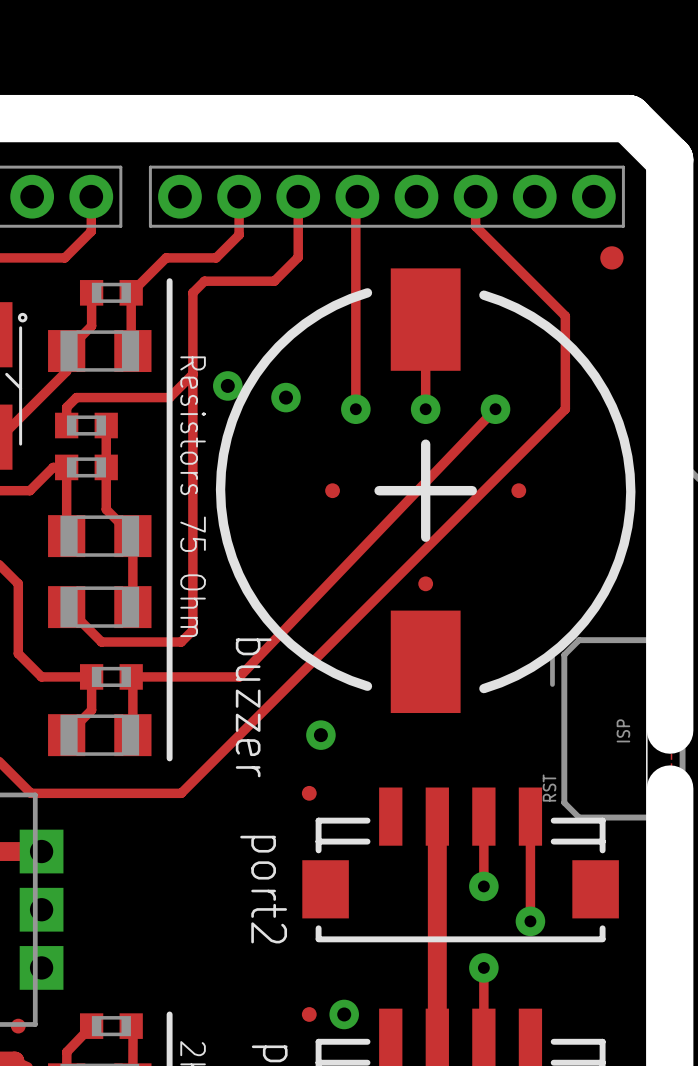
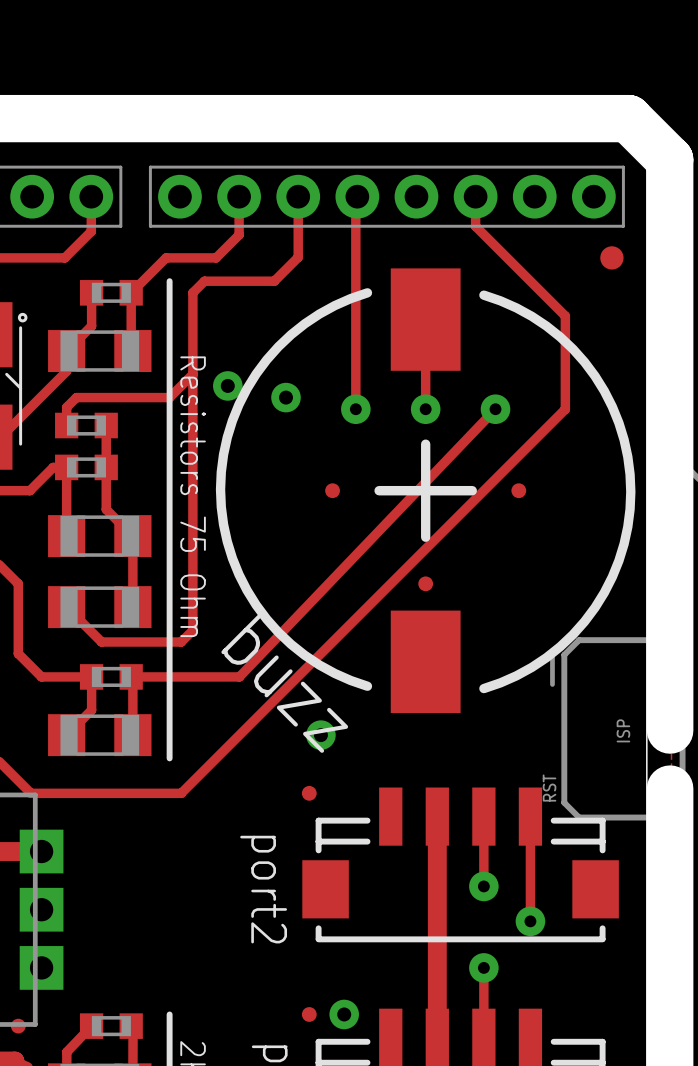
text: buzzer (253, 707) -> buzz (284, 683)

